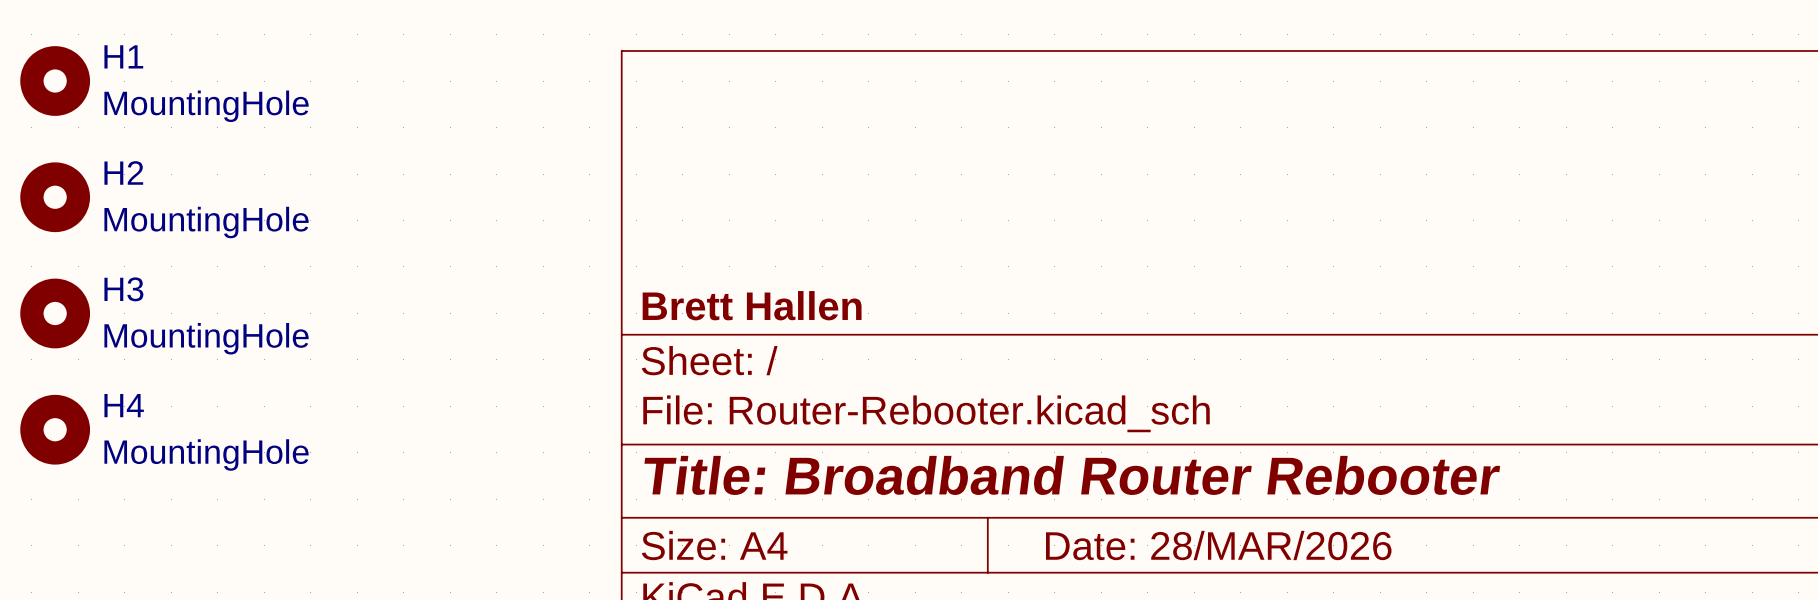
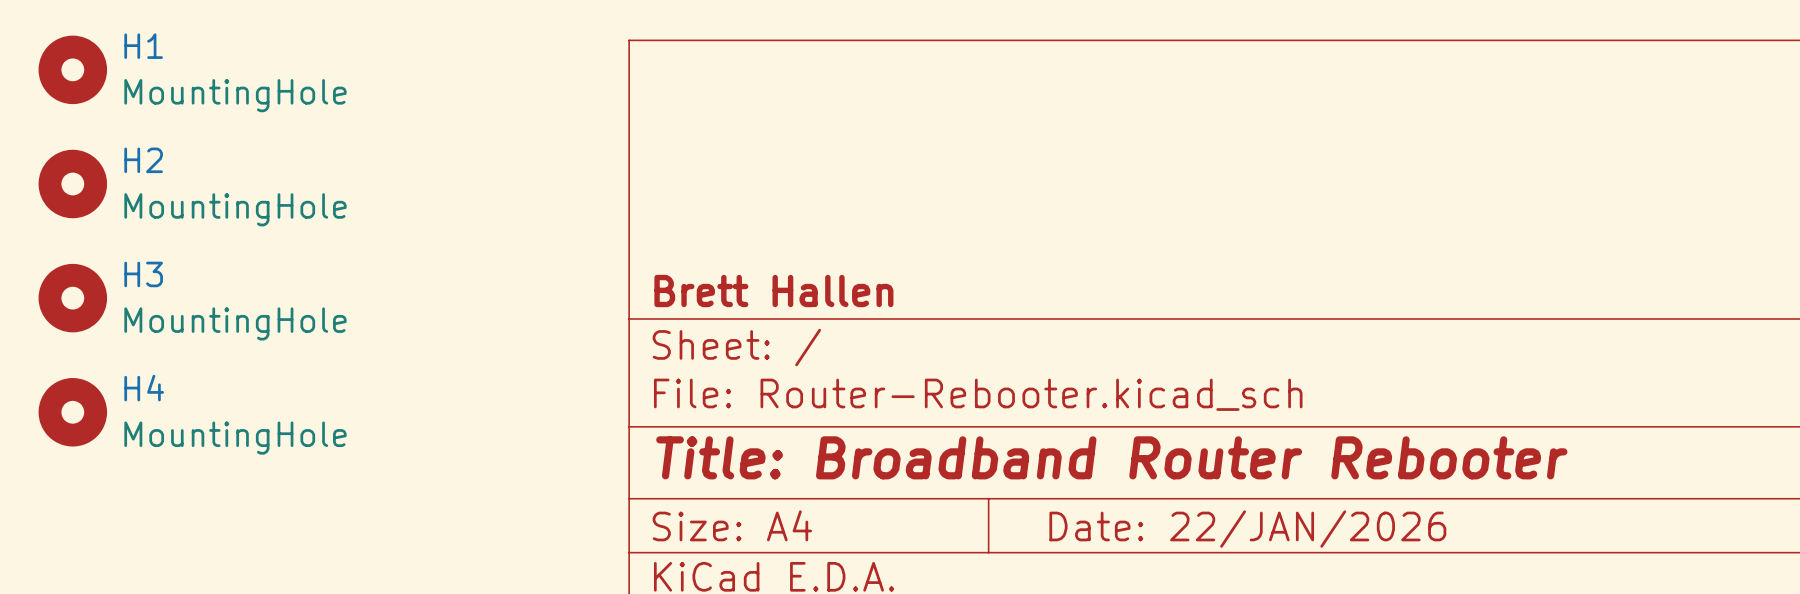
title block: Date: 28/MAR/2026 (1218, 545) -> Date: 22/JAN/2026 (1247, 529)

